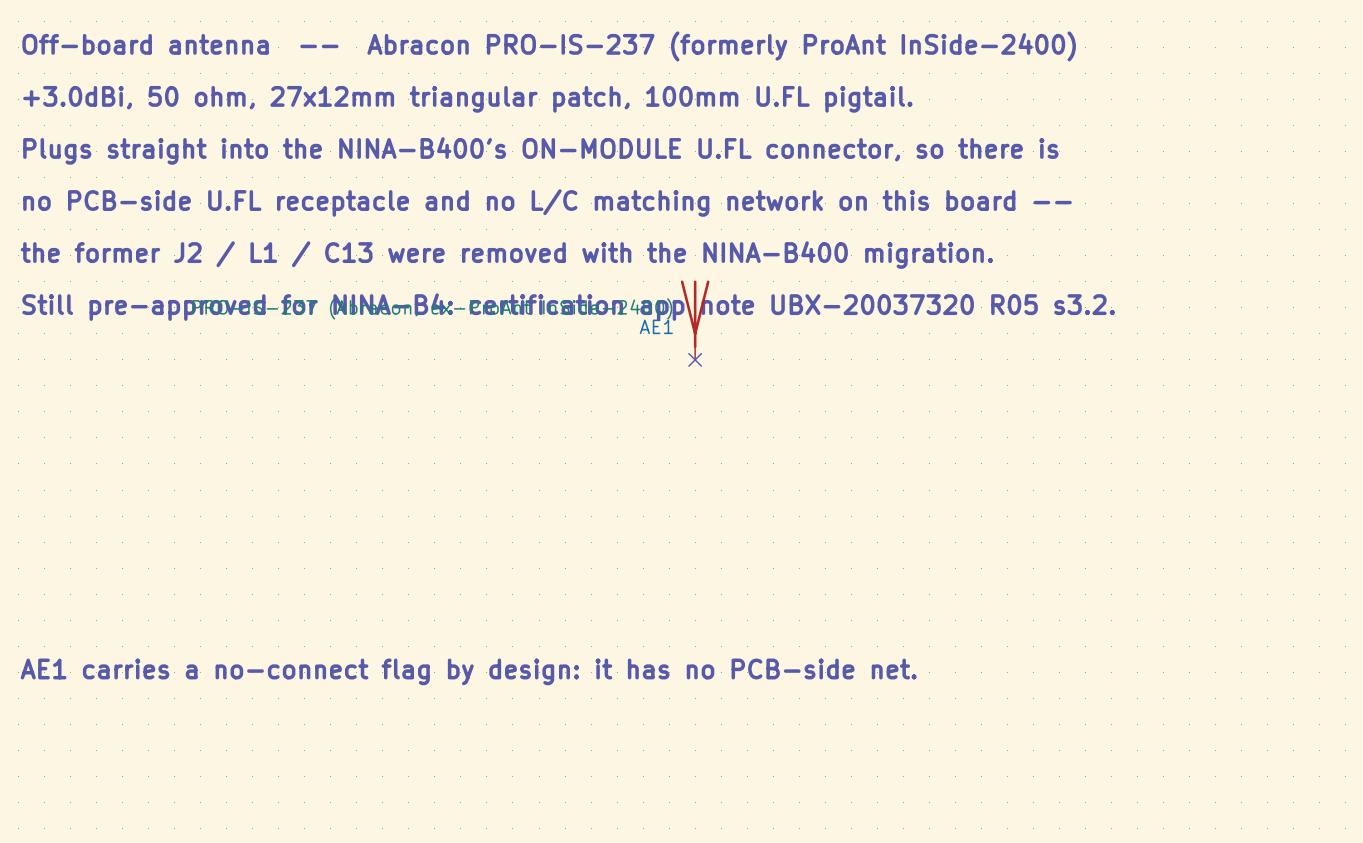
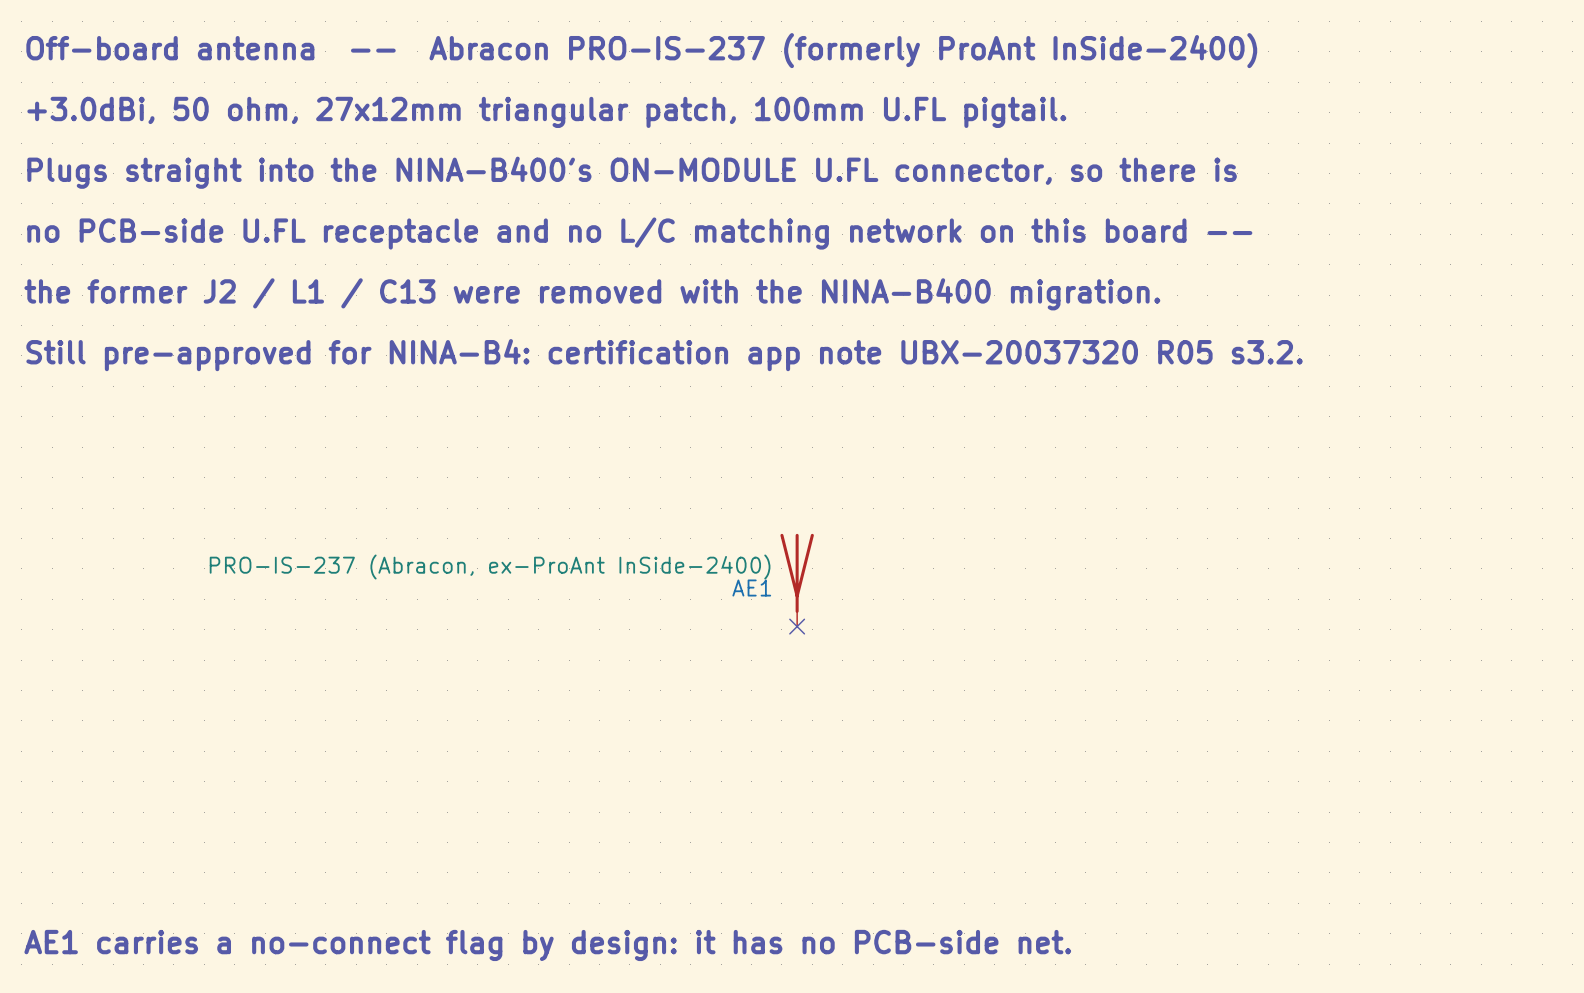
AE1 position: (695, 320) -> (797, 580)
no-connect mark: (695, 359) -> none
no-connect mark: none -> (797, 626)
text position: AE1 carries a no-connect flag by design: it has no PCB-side net. (468, 671) -> AE1 carries a no-connect flag by design: it has no PCB-side net. (547, 945)

